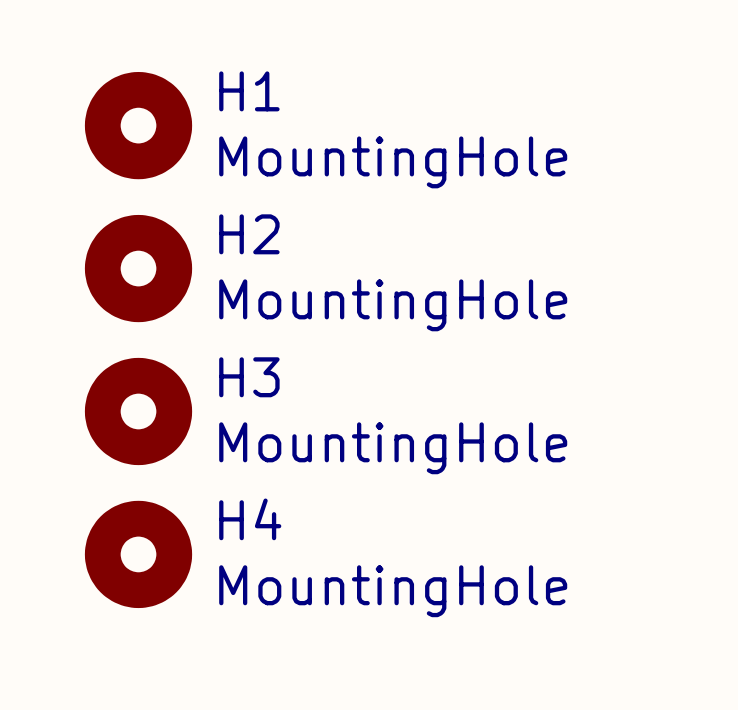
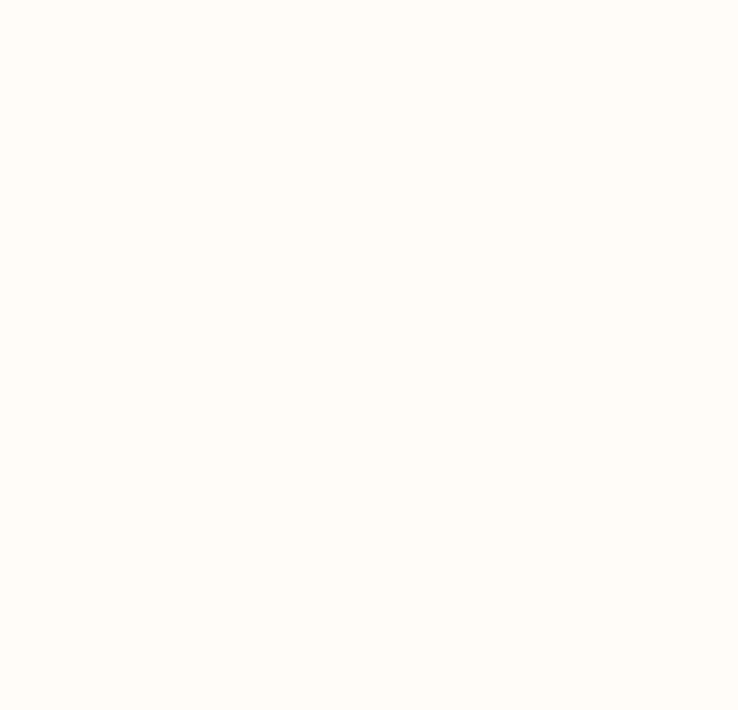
H1: MountingHole (138, 125) -> none
H2: MountingHole (138, 268) -> none
H3: MountingHole (138, 411) -> none
H4: MountingHole (138, 554) -> none

